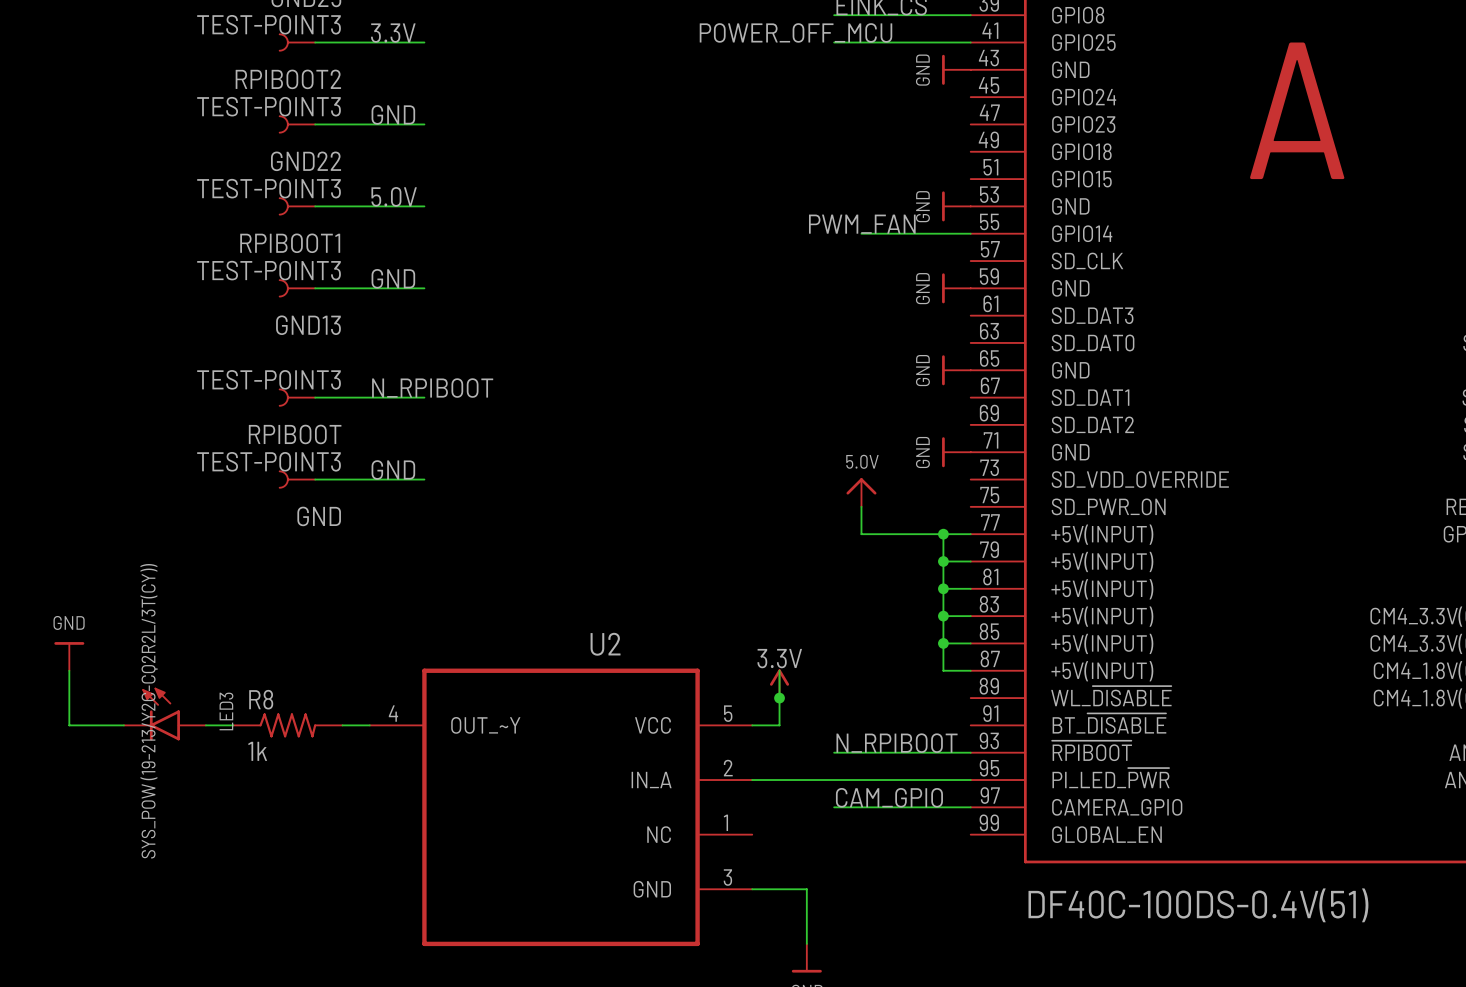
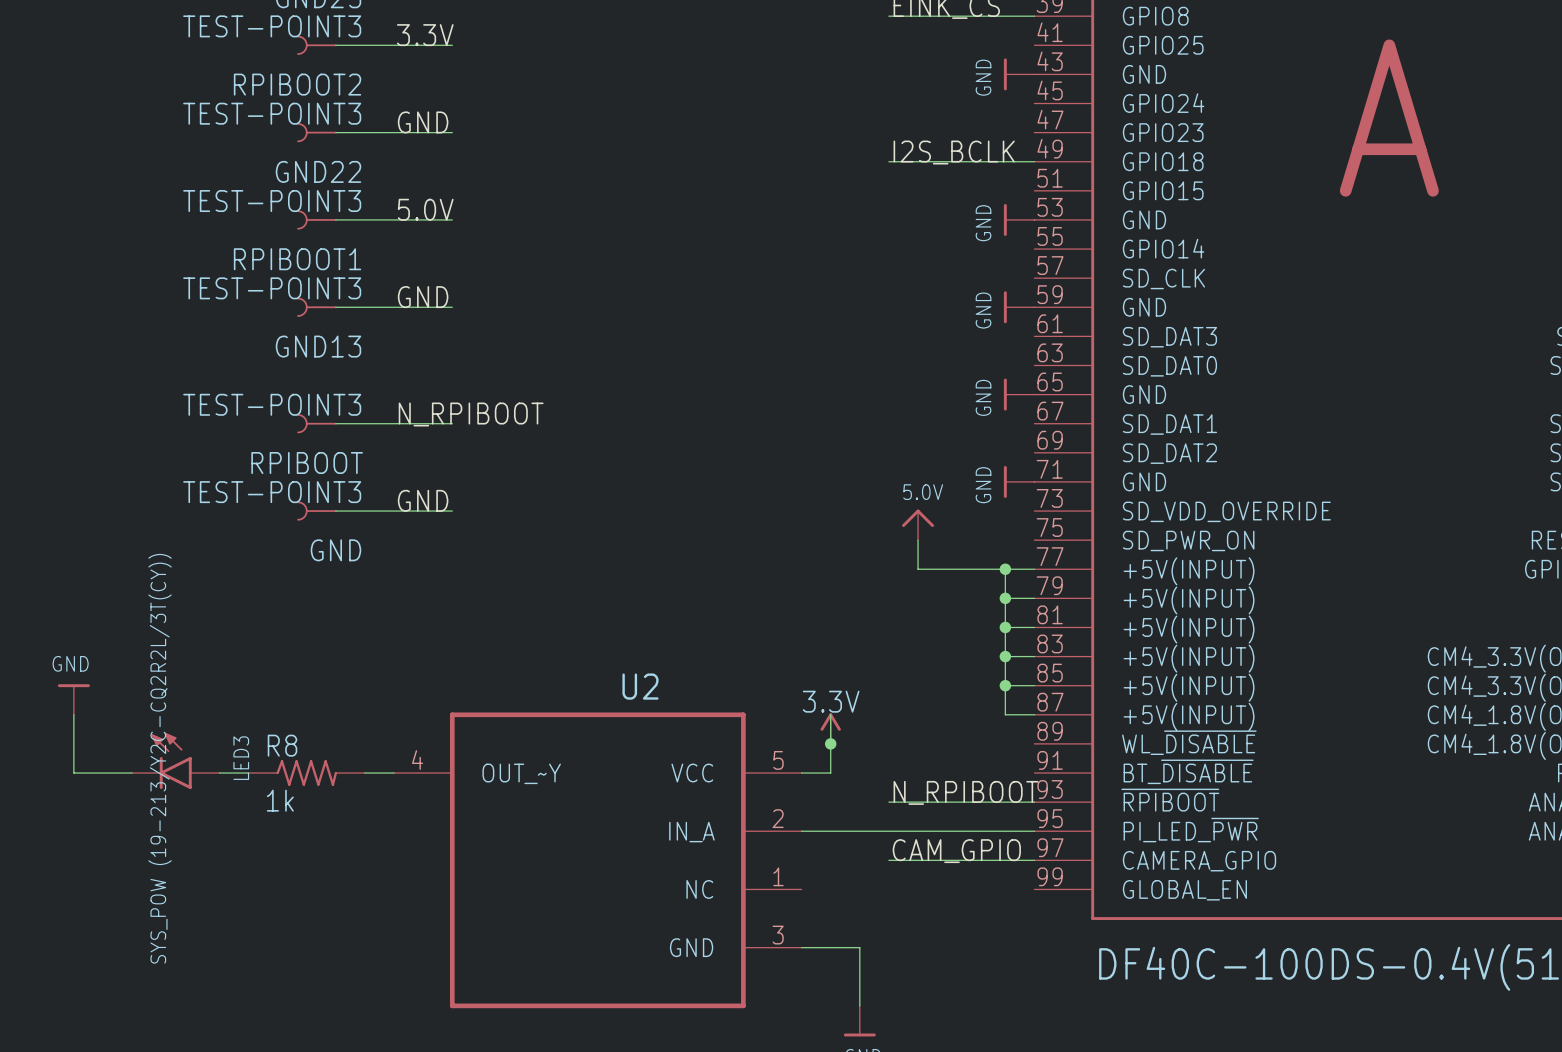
label: POWER_OFF_MCU (795, 32) -> none
wire: (834, 42) (970, 42) -> (888, 161) (1034, 161)
label: none -> I2S_BCLK (954, 152)
label: PWM_FAN (862, 224) -> none
wire: (861, 233) (970, 233) -> none

